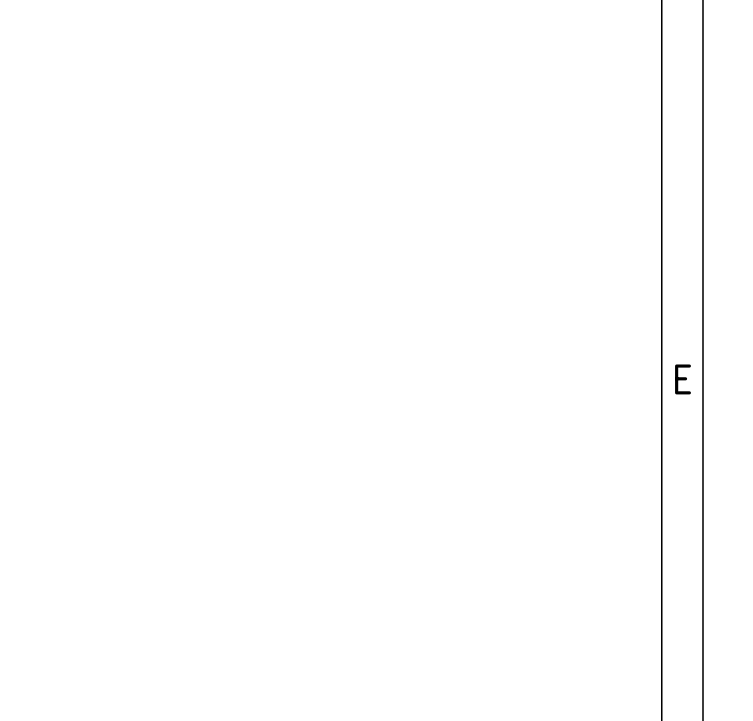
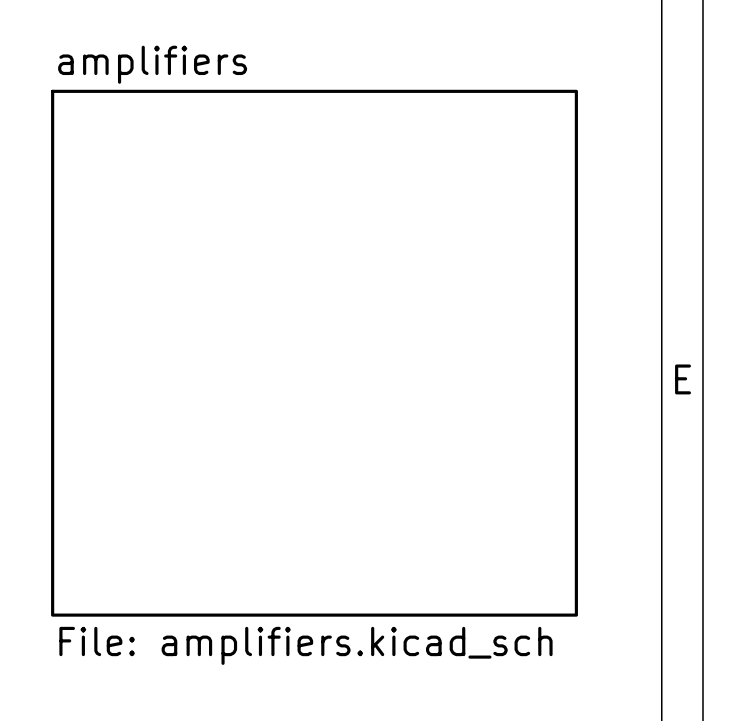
sheet amplifiers: none -> File: amplifiers.kicad_sch (314, 353)

